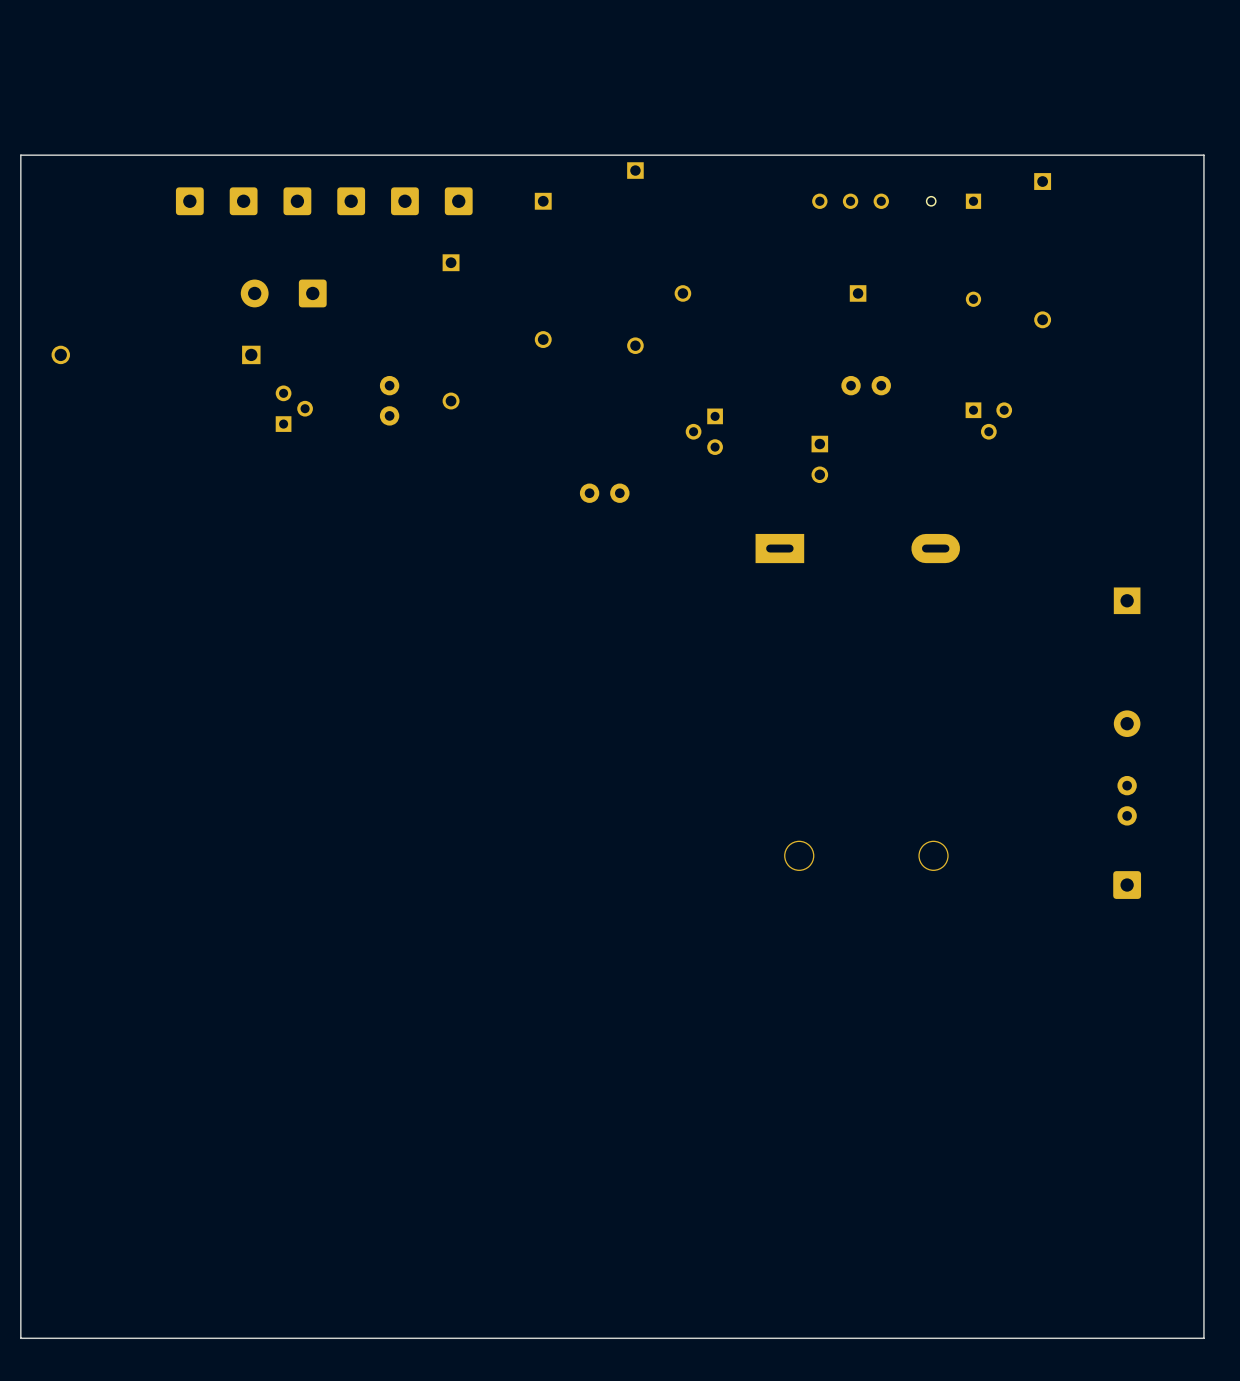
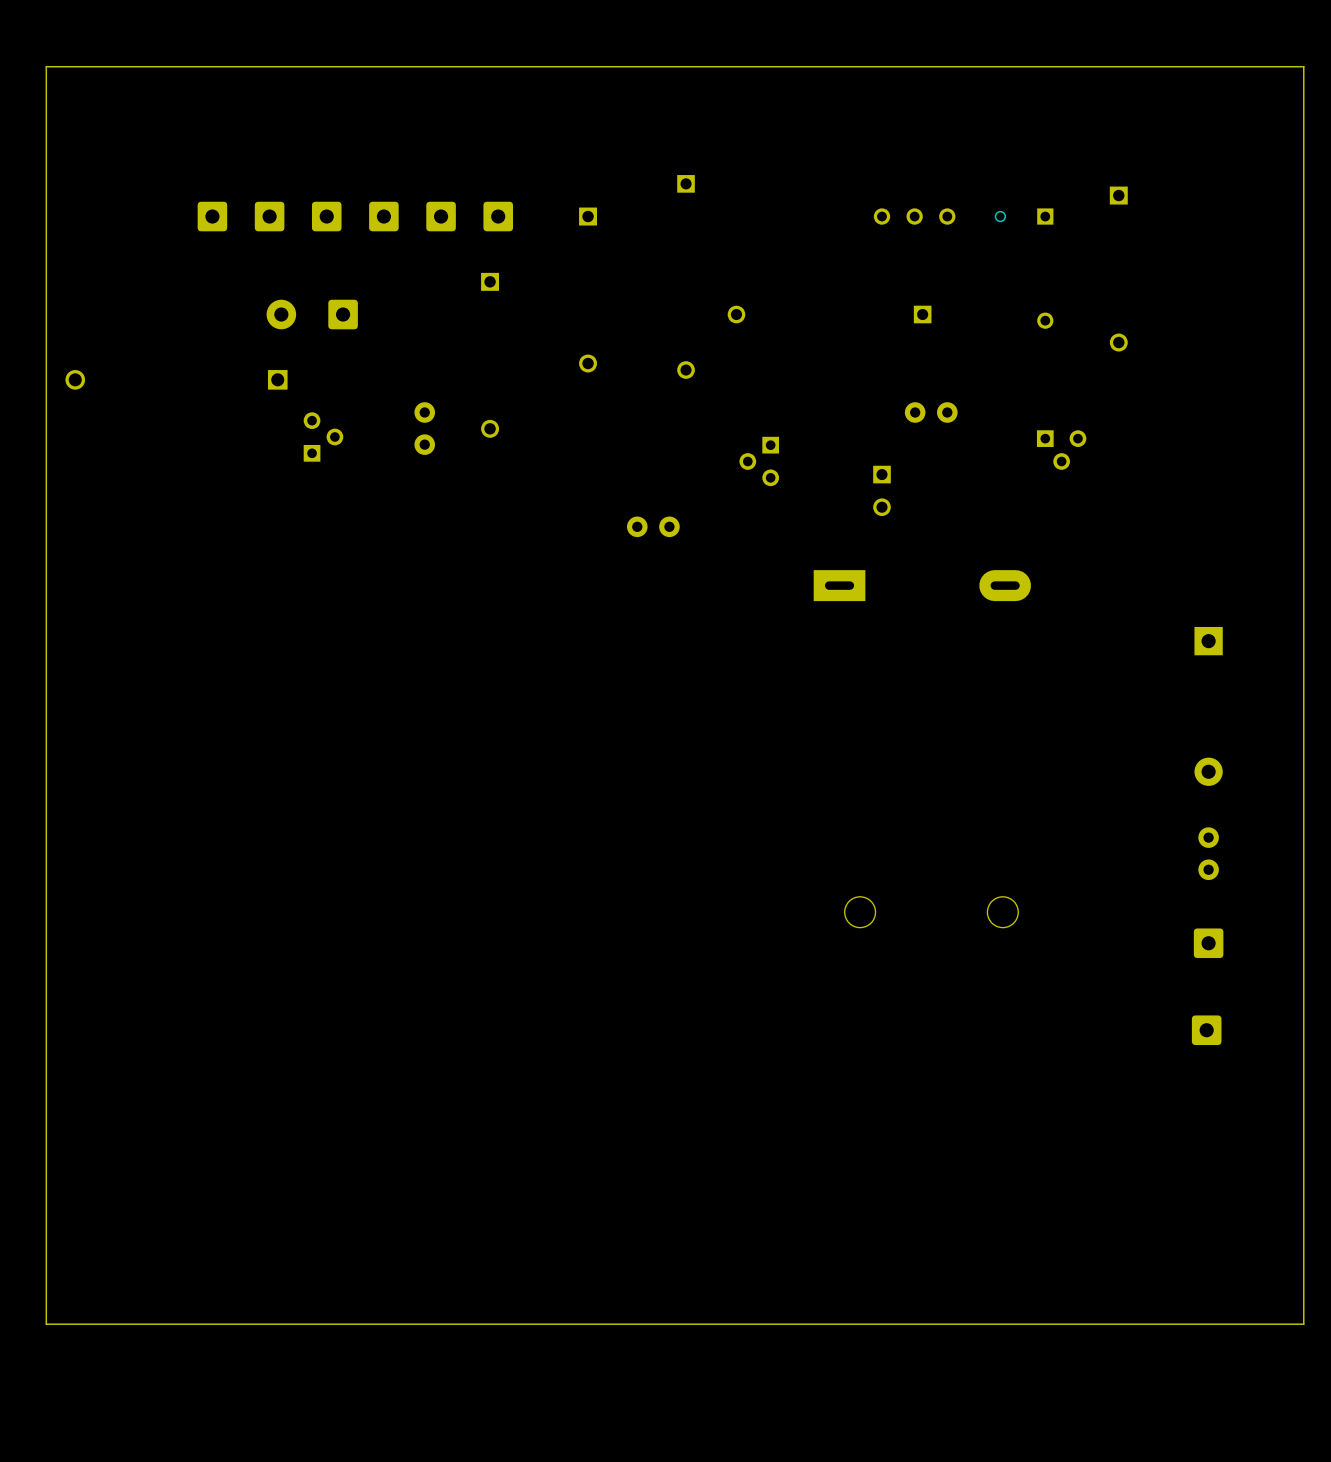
board edge: (1203, 155) (20, 155) (20, 1338) (1203, 1338) (1203, 155) -> (1303, 66) (1303, 1324) (46, 1324) (46, 66) (1303, 66)
part: none -> (1206, 1030)

